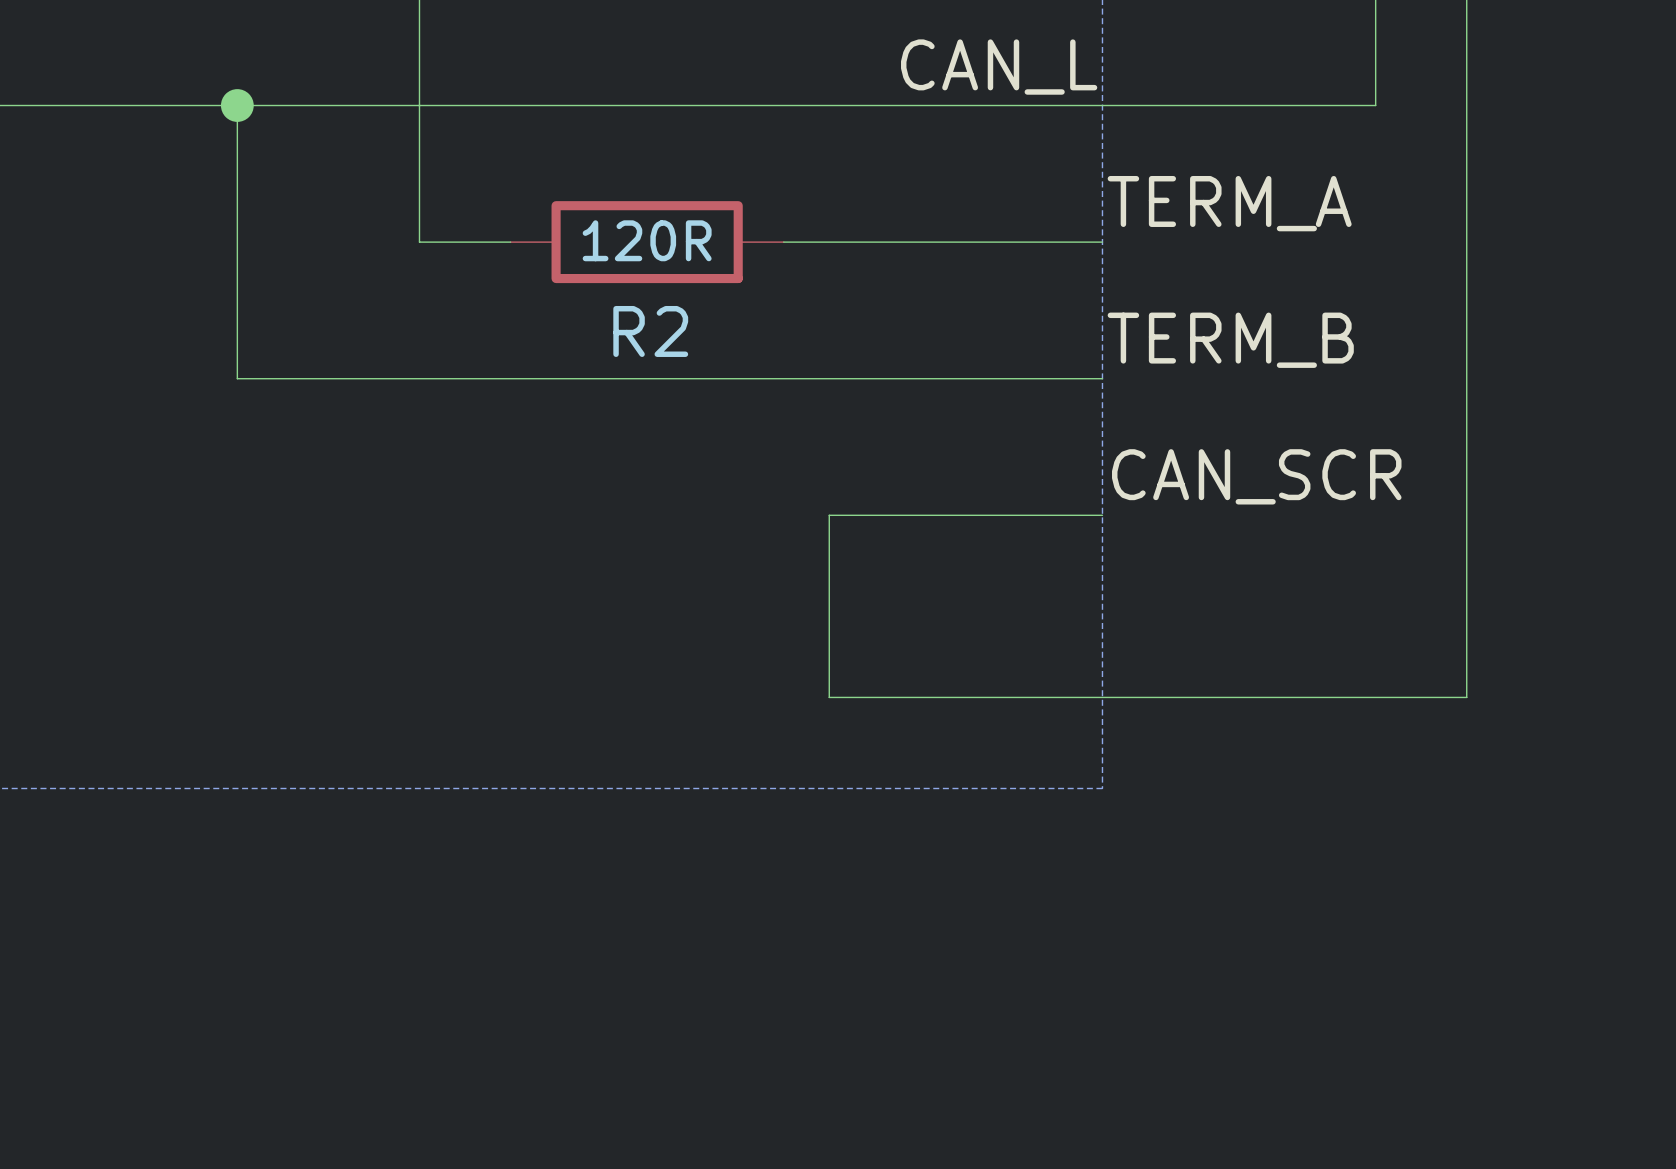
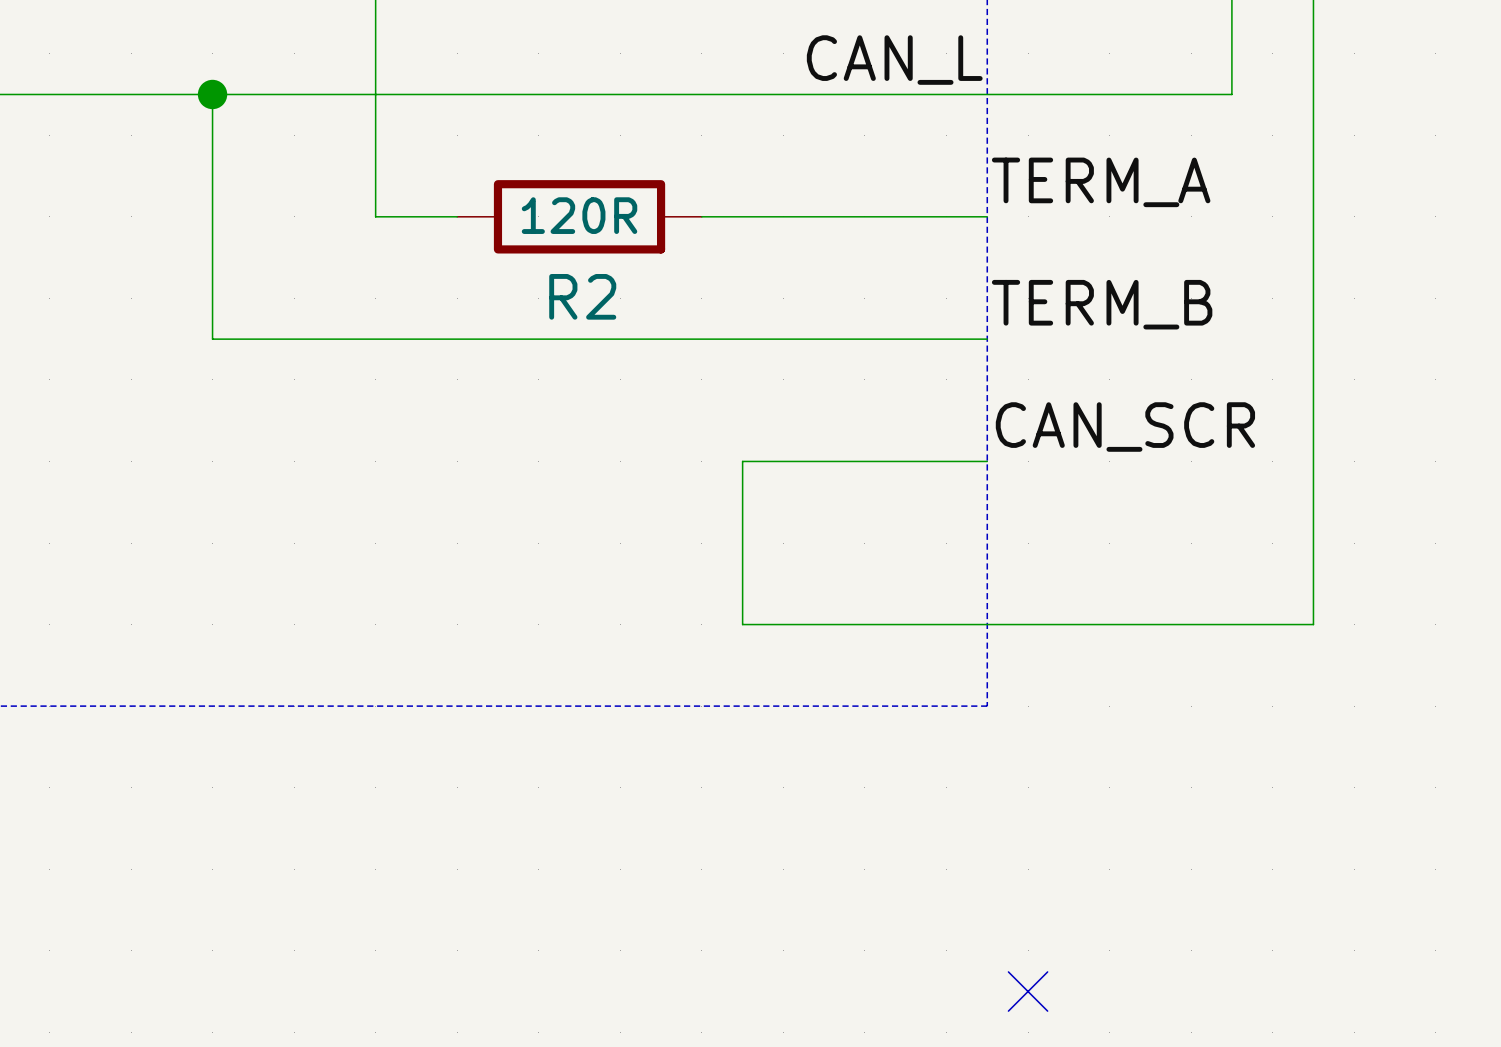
no-connect mark: none -> (1028, 991)

